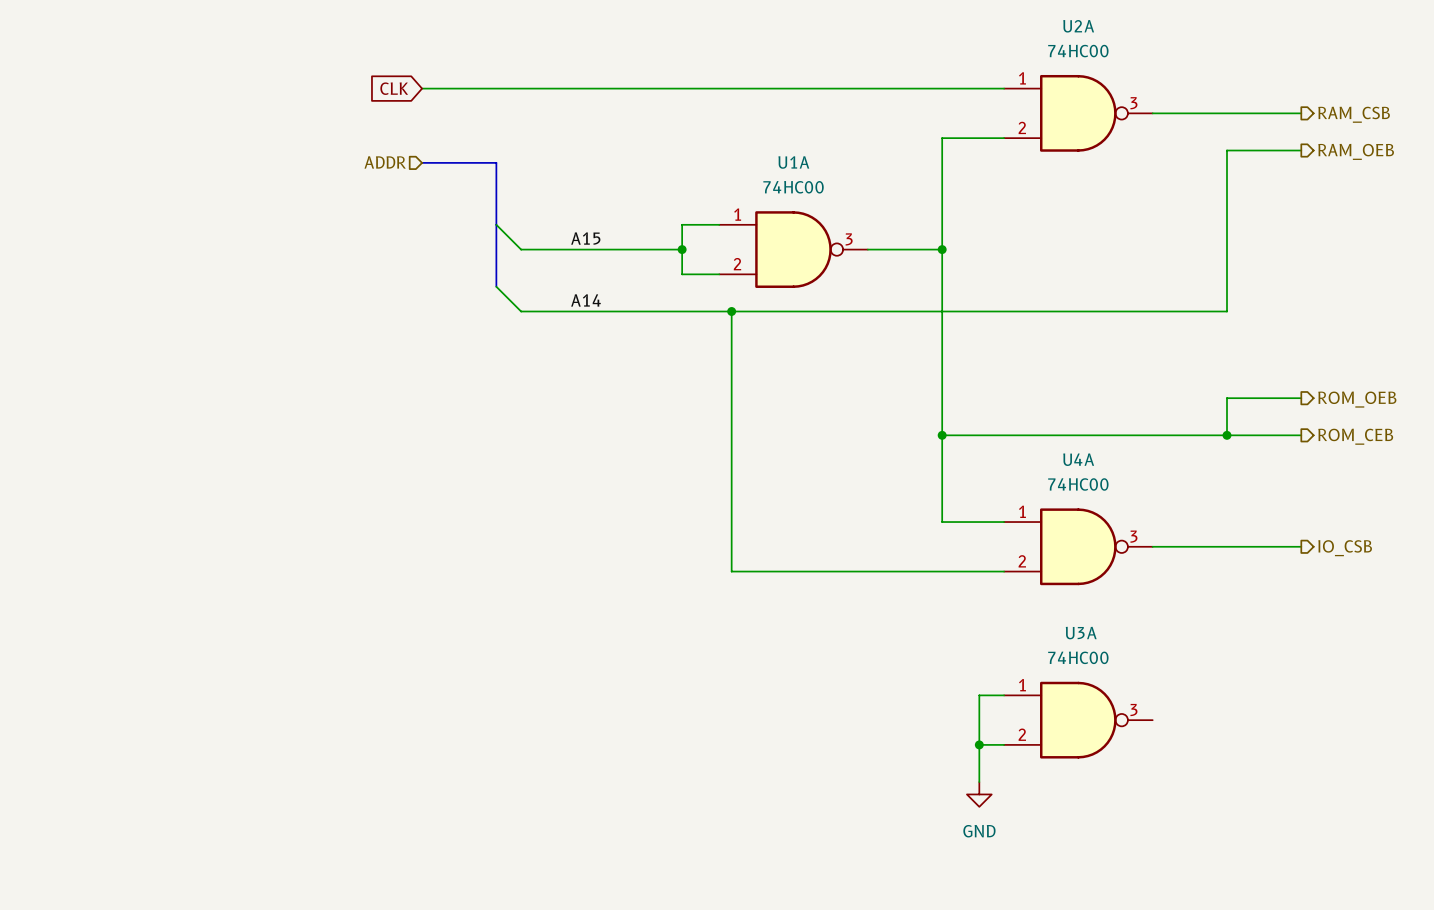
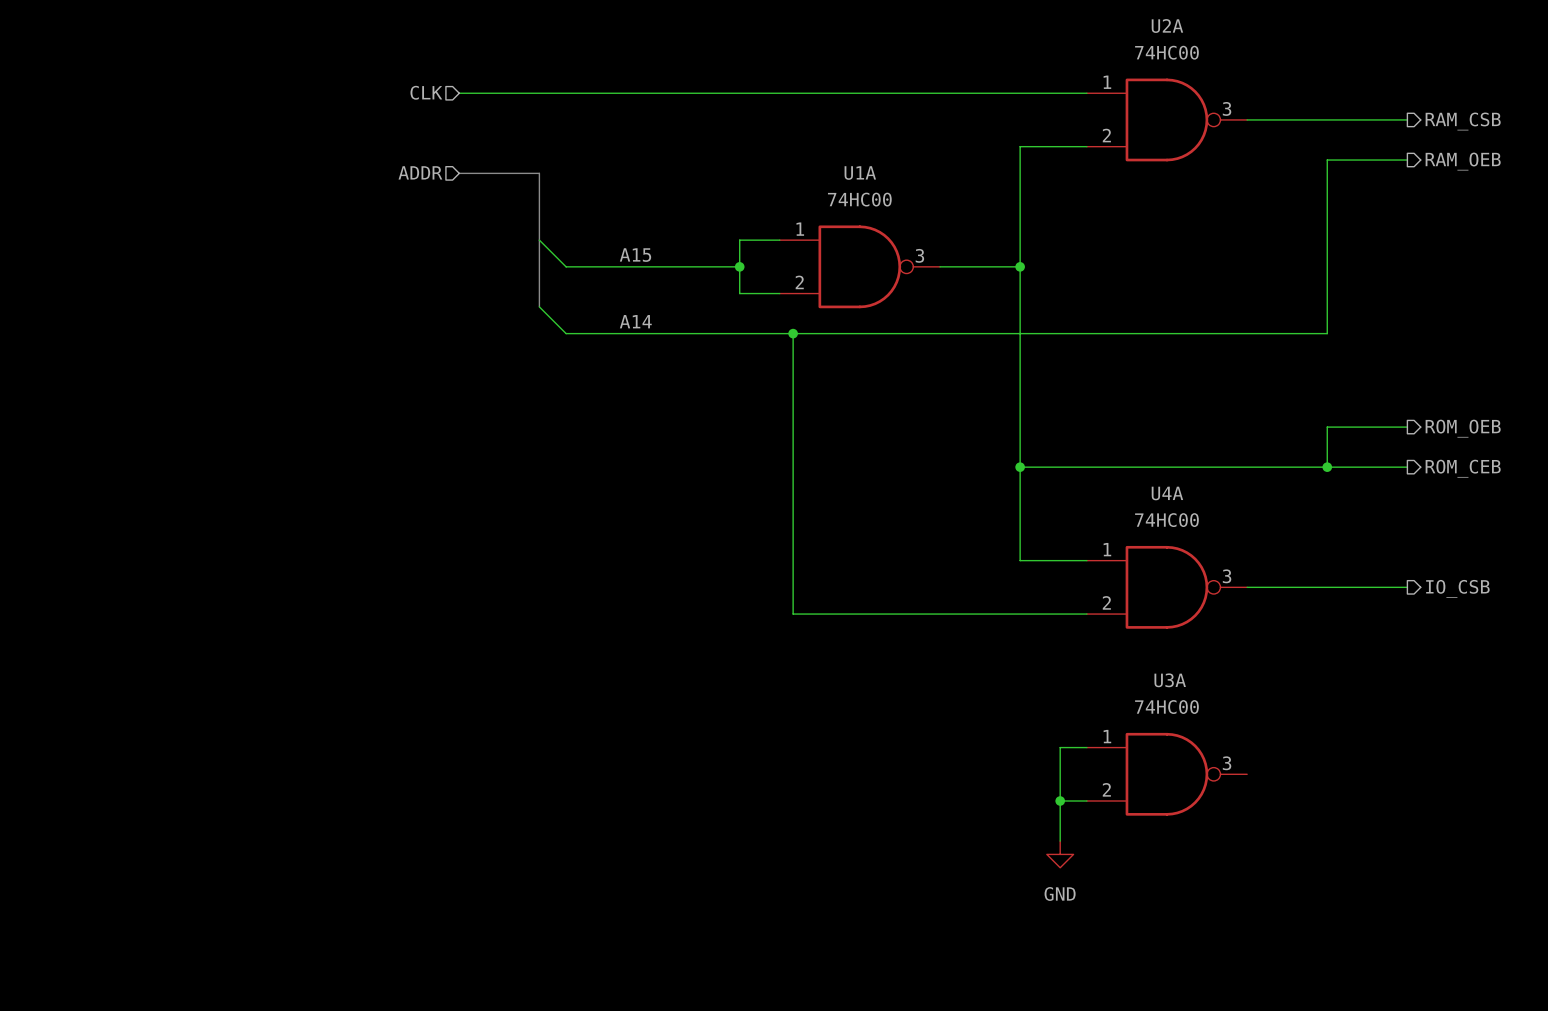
hierarchical label: none -> CLK (426, 92)
global label: CLK (394, 88) -> none

